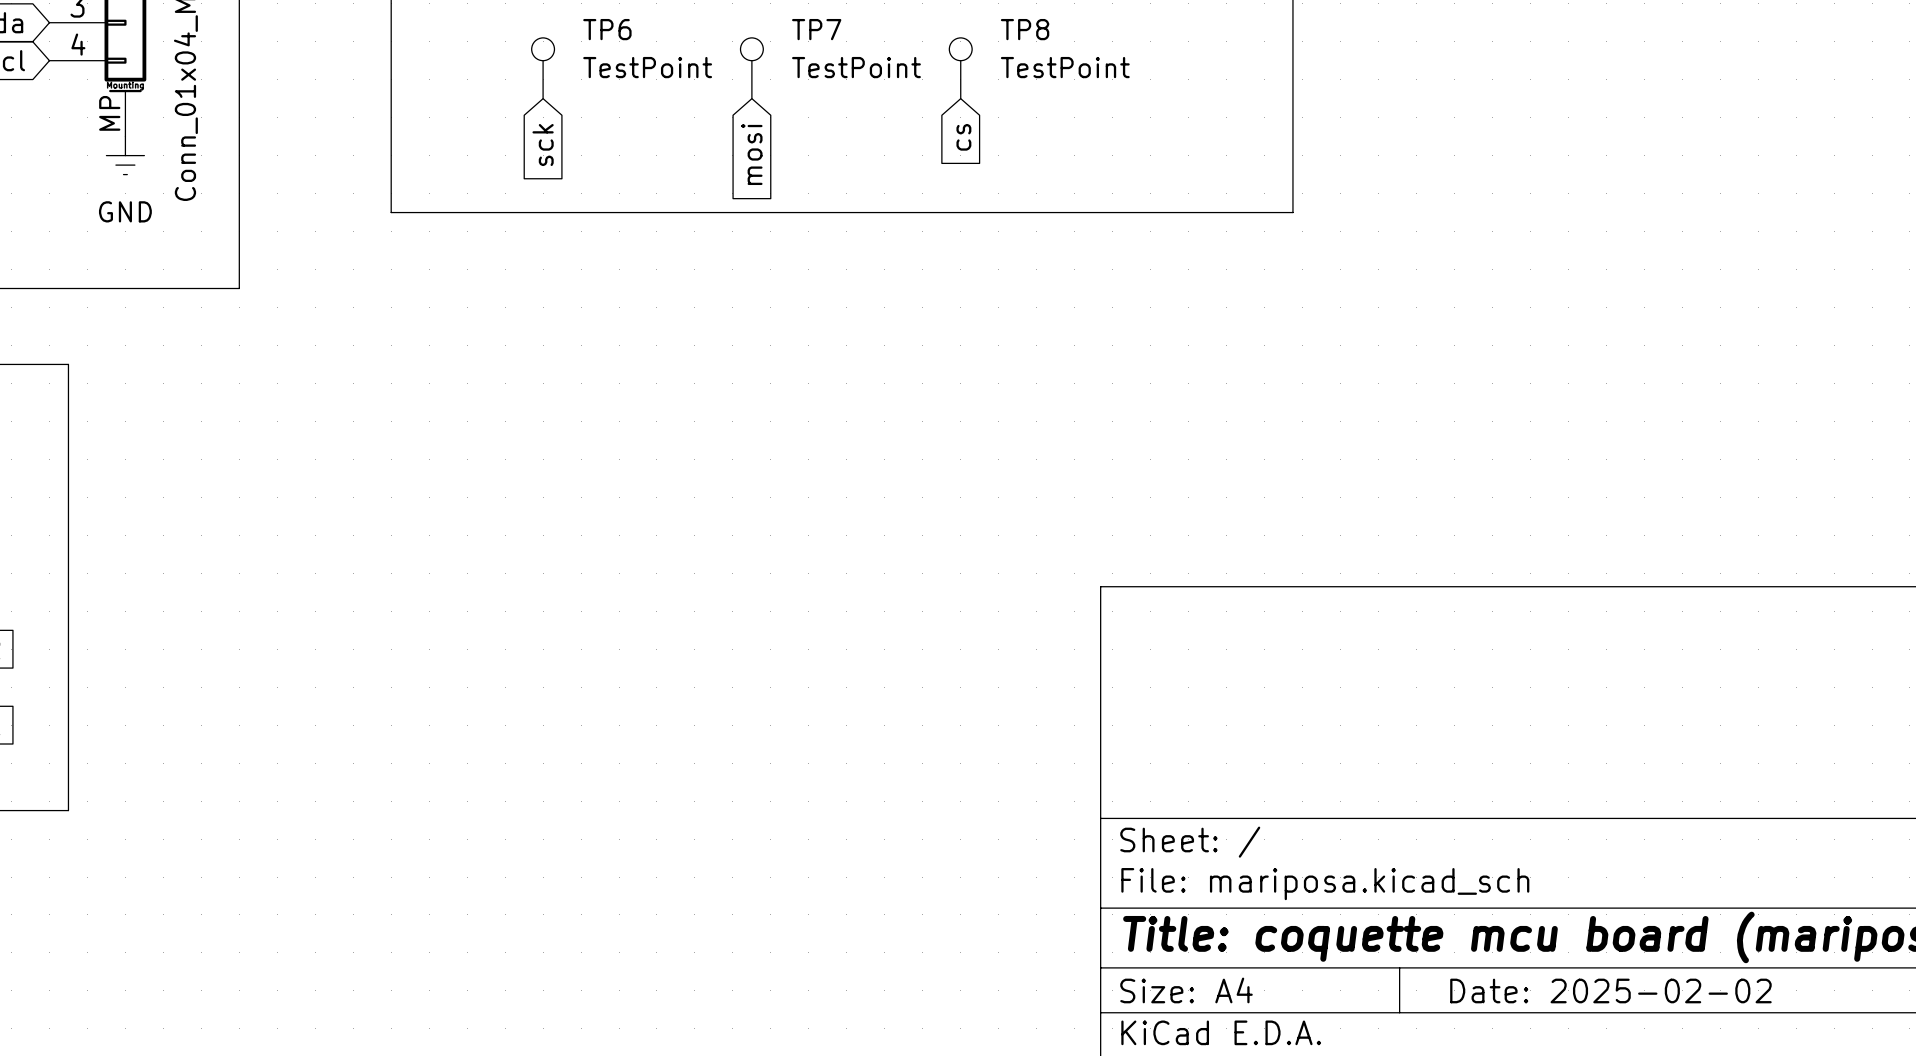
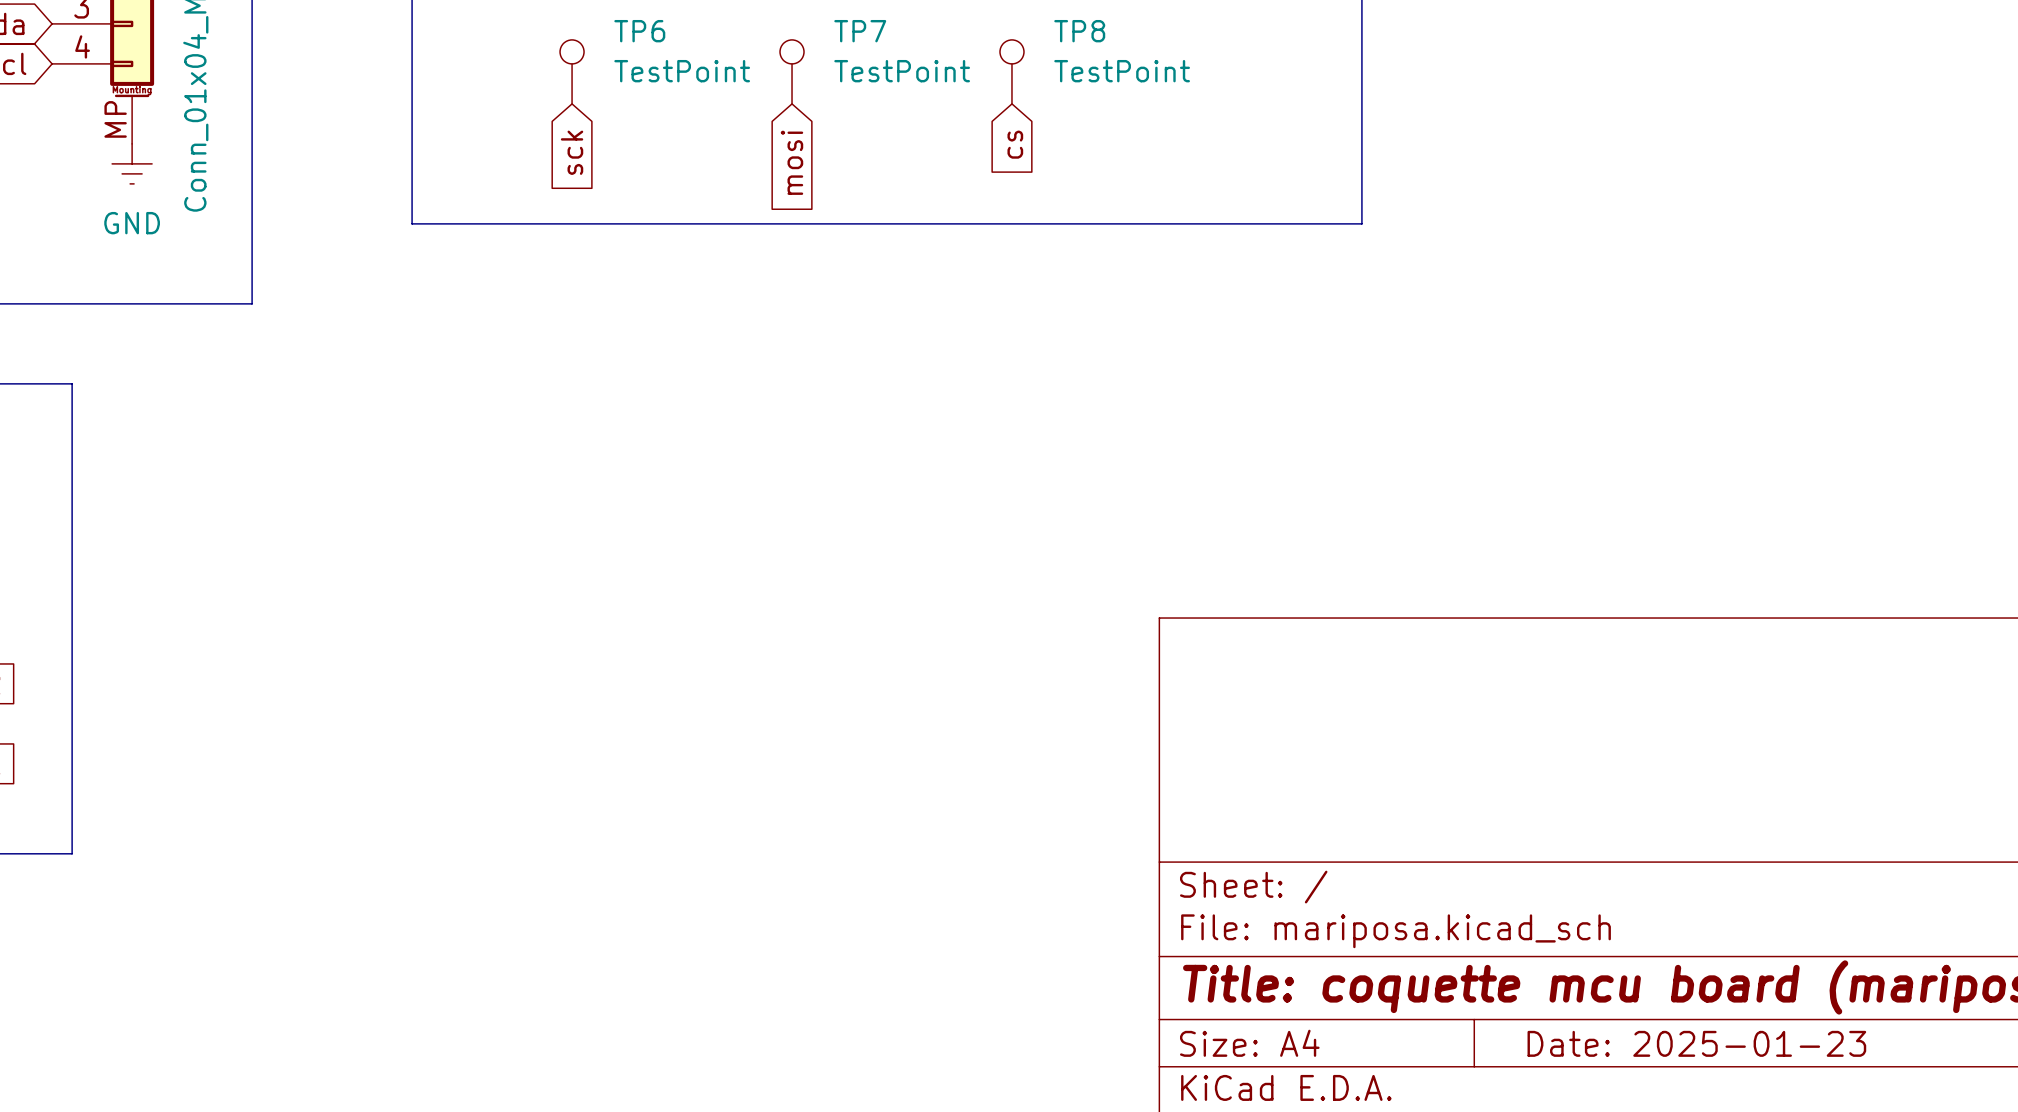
title block: Date: 2025-02-02 (1610, 990) -> Date: 2025-01-23 (1696, 1043)

